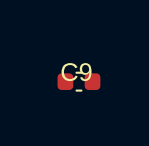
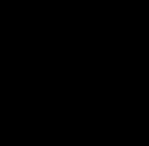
C9: (78, 81) -> none

